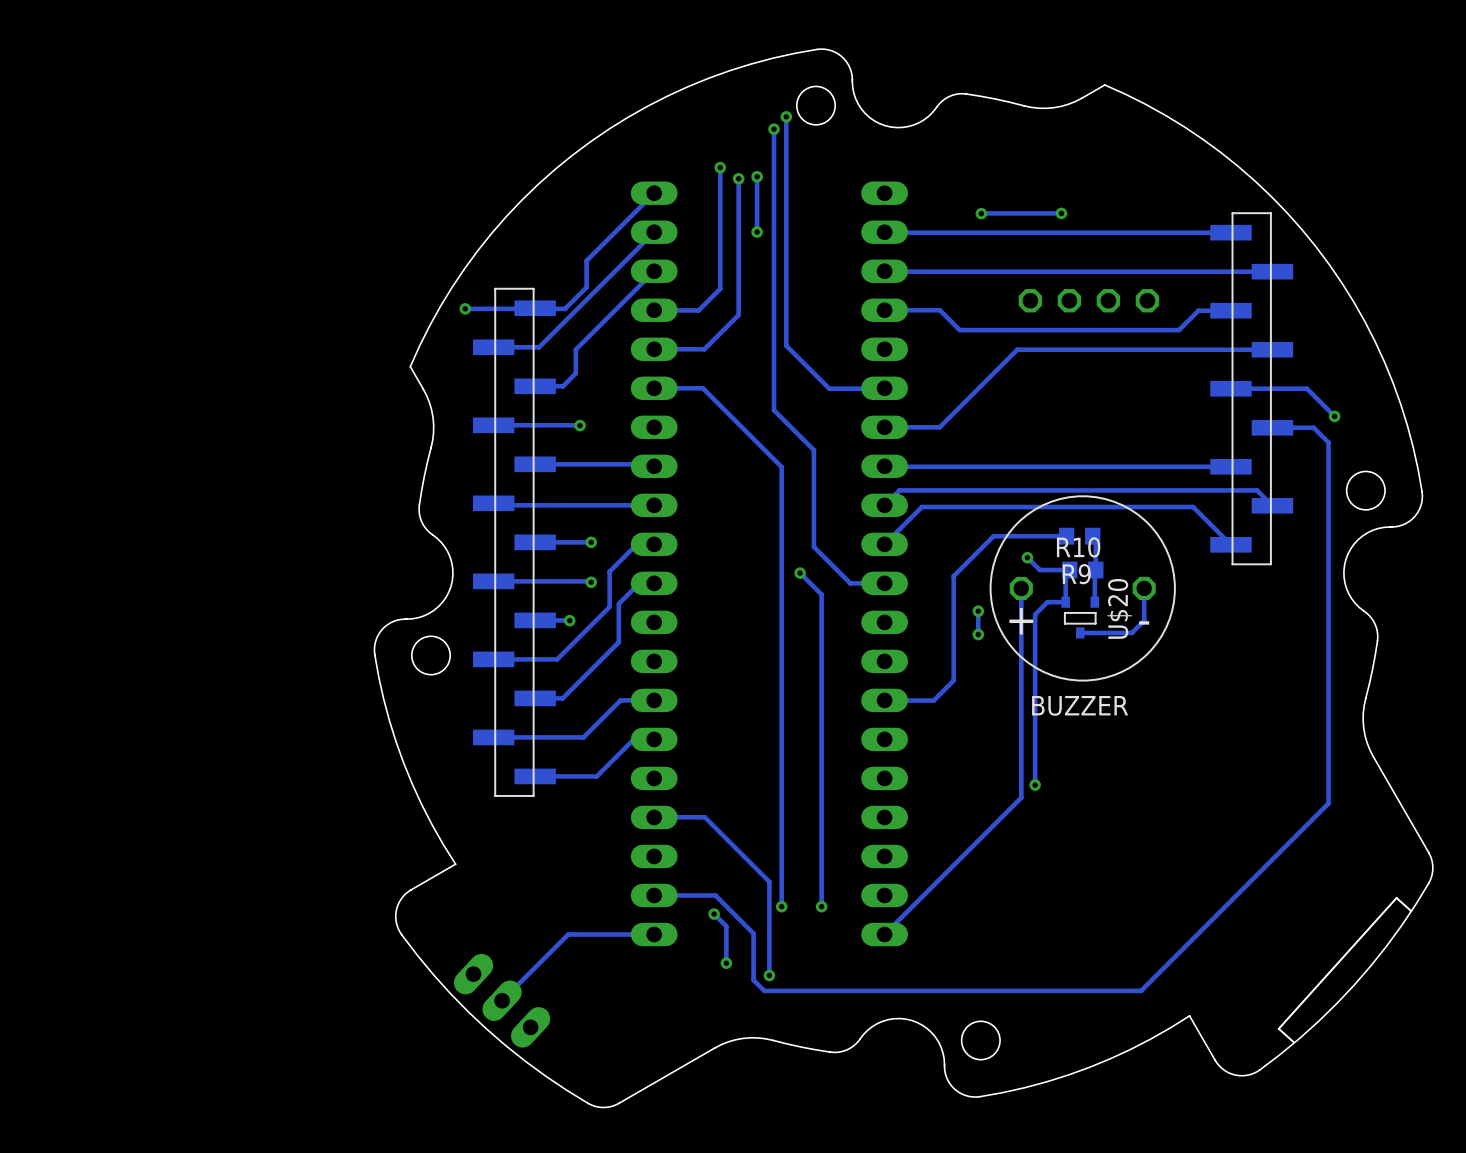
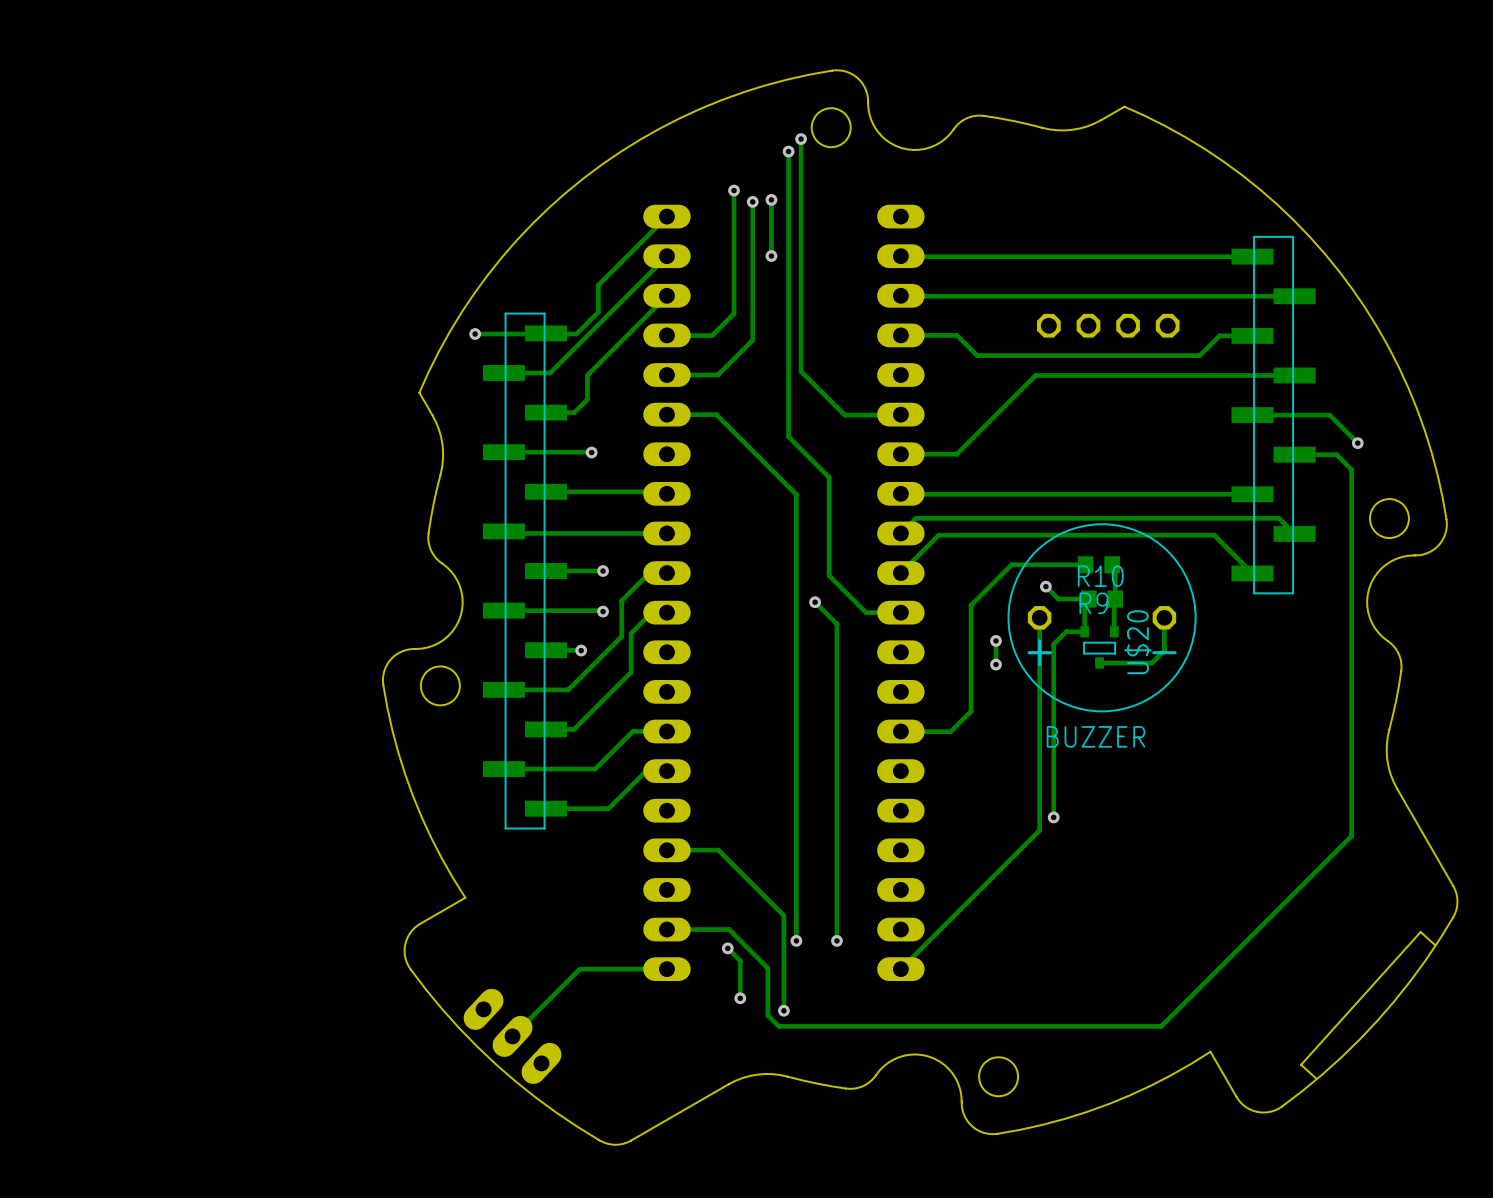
via: (981, 213) -> none
track: (1061, 213) (981, 213) -> none
via: (1061, 213) -> none

